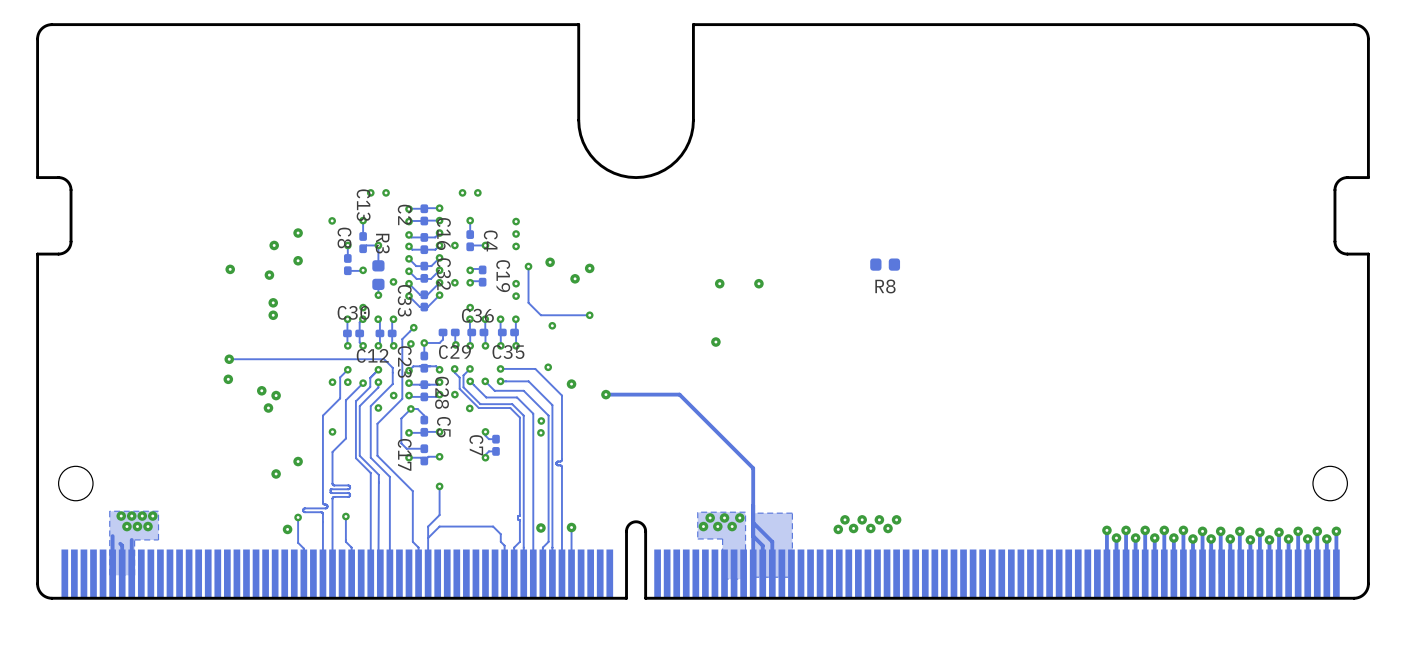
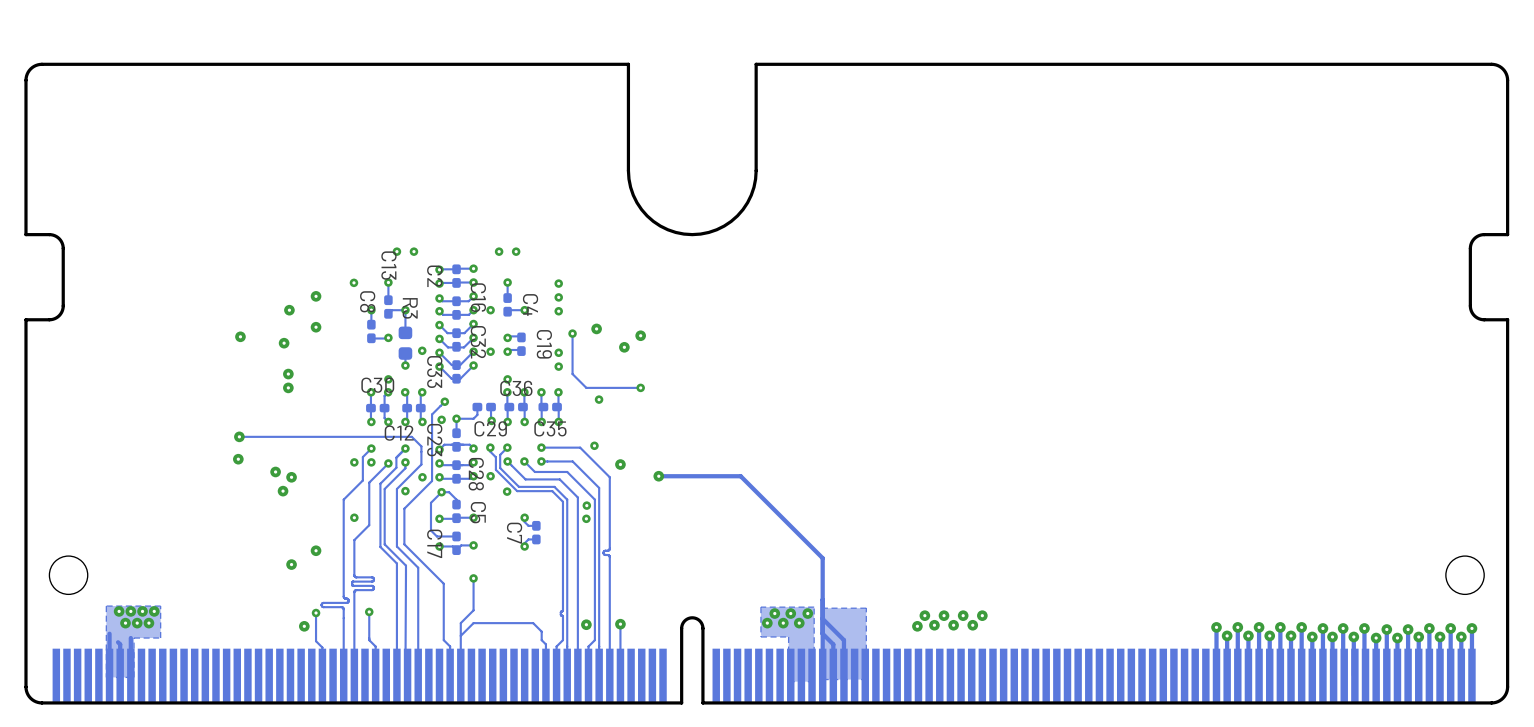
R8: (885, 264) -> none
via: (719, 283) -> none
via: (758, 283) -> none
via: (715, 342) -> none

